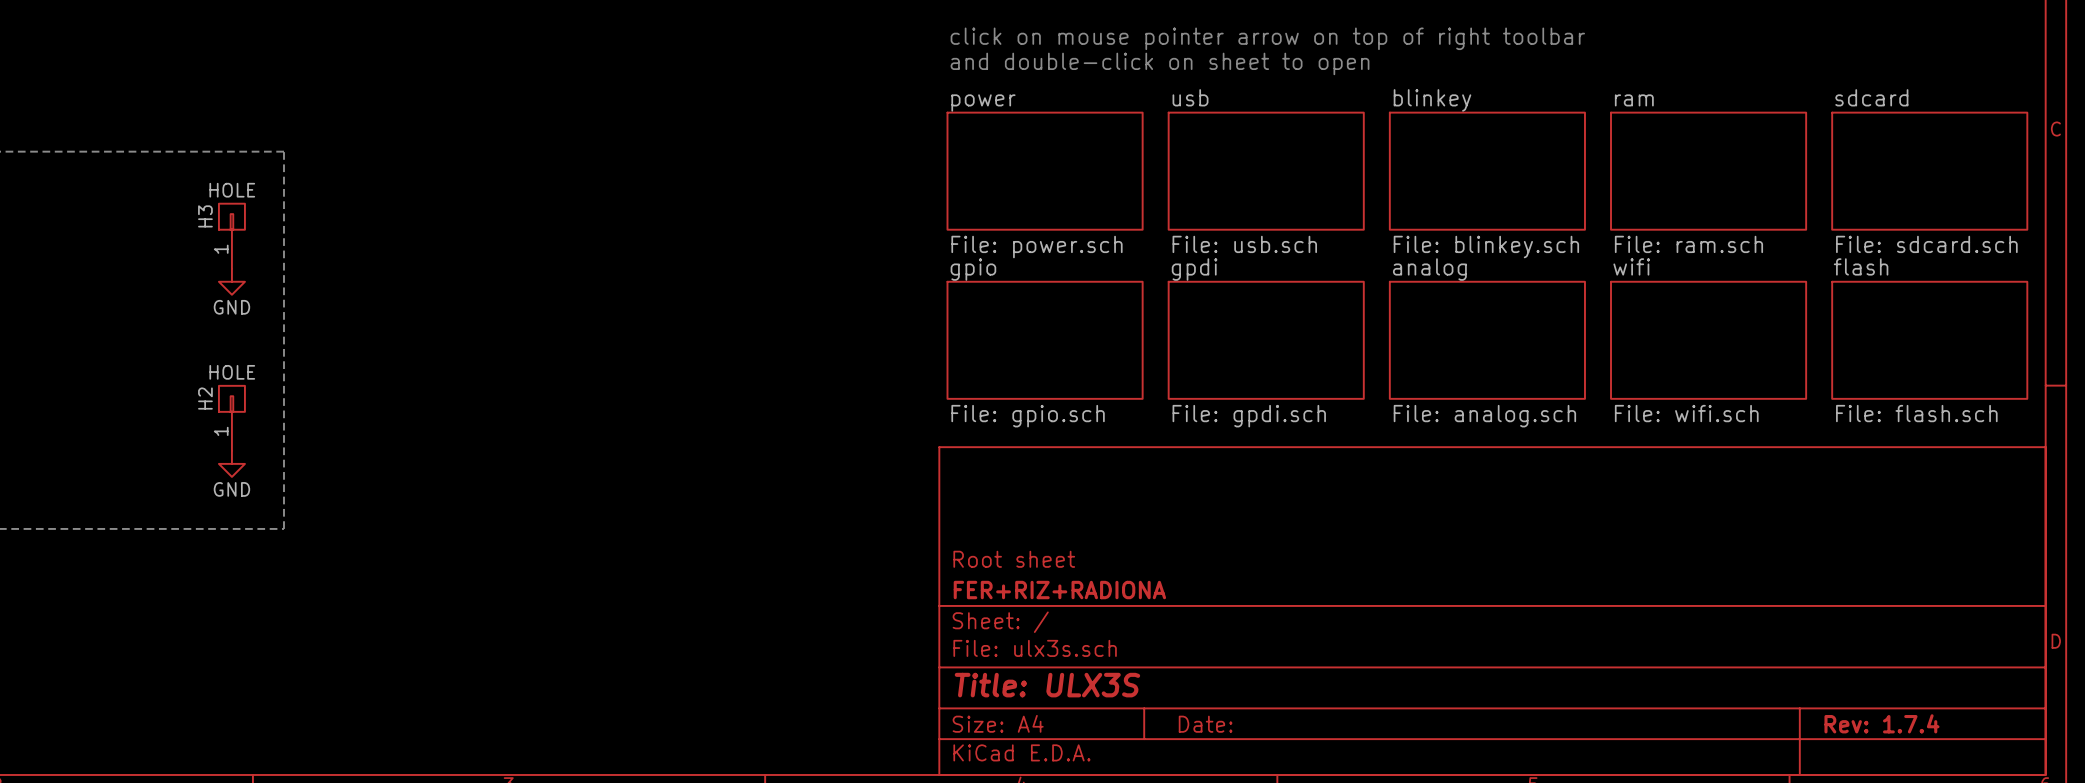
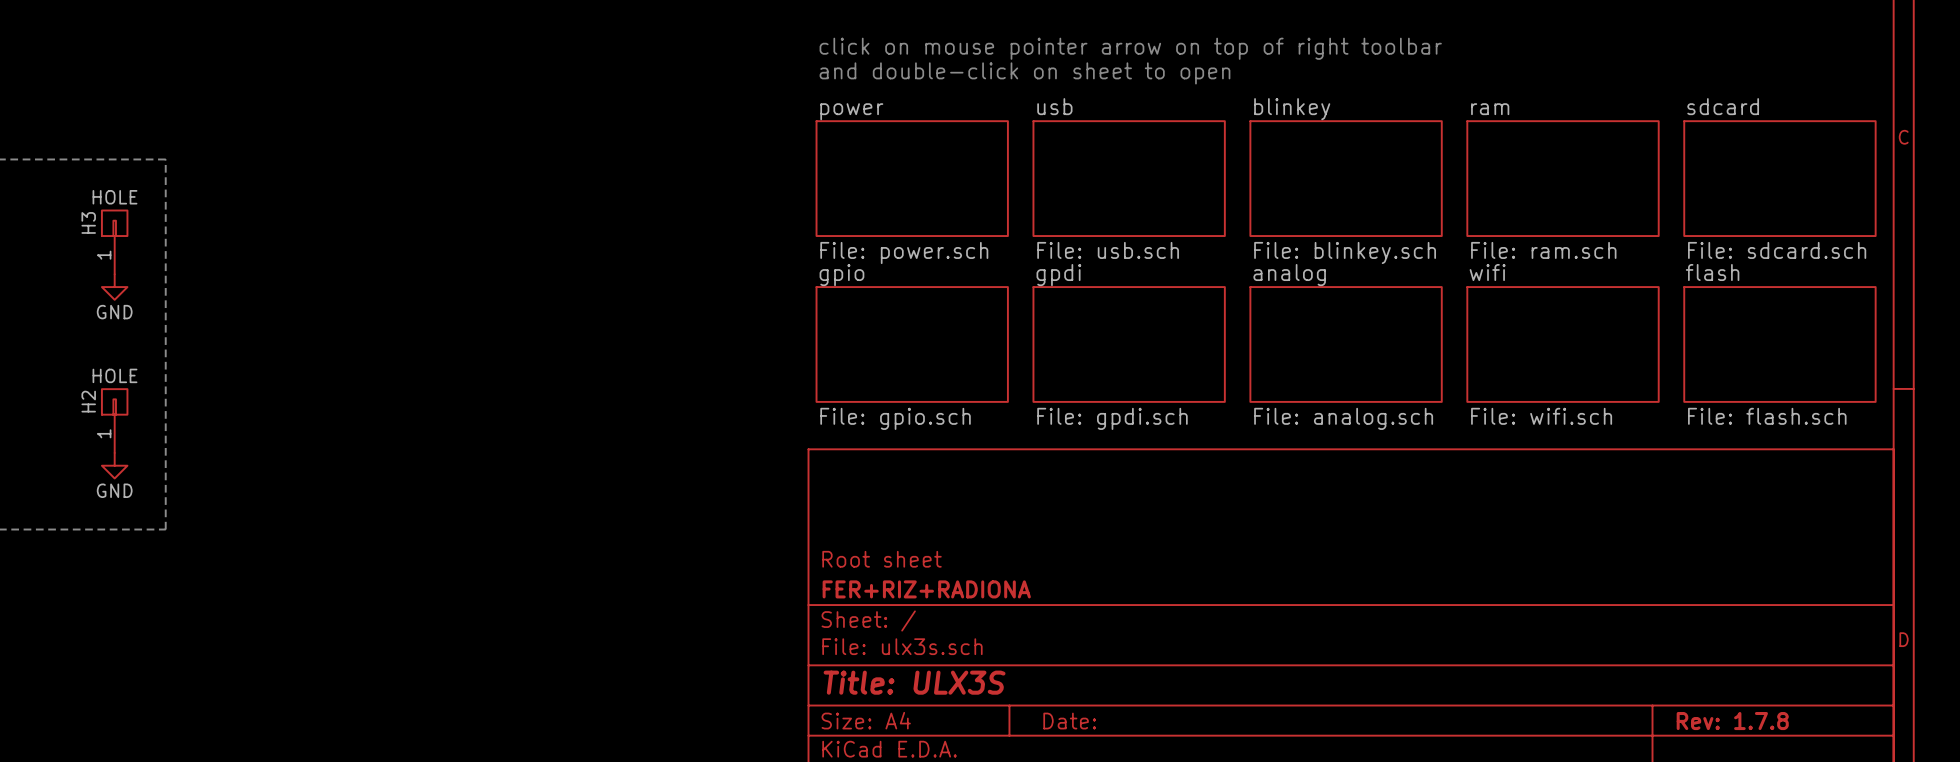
title block: Rev: 1.7.4 (1881, 723) -> Rev: 1.7.8 (1732, 721)

